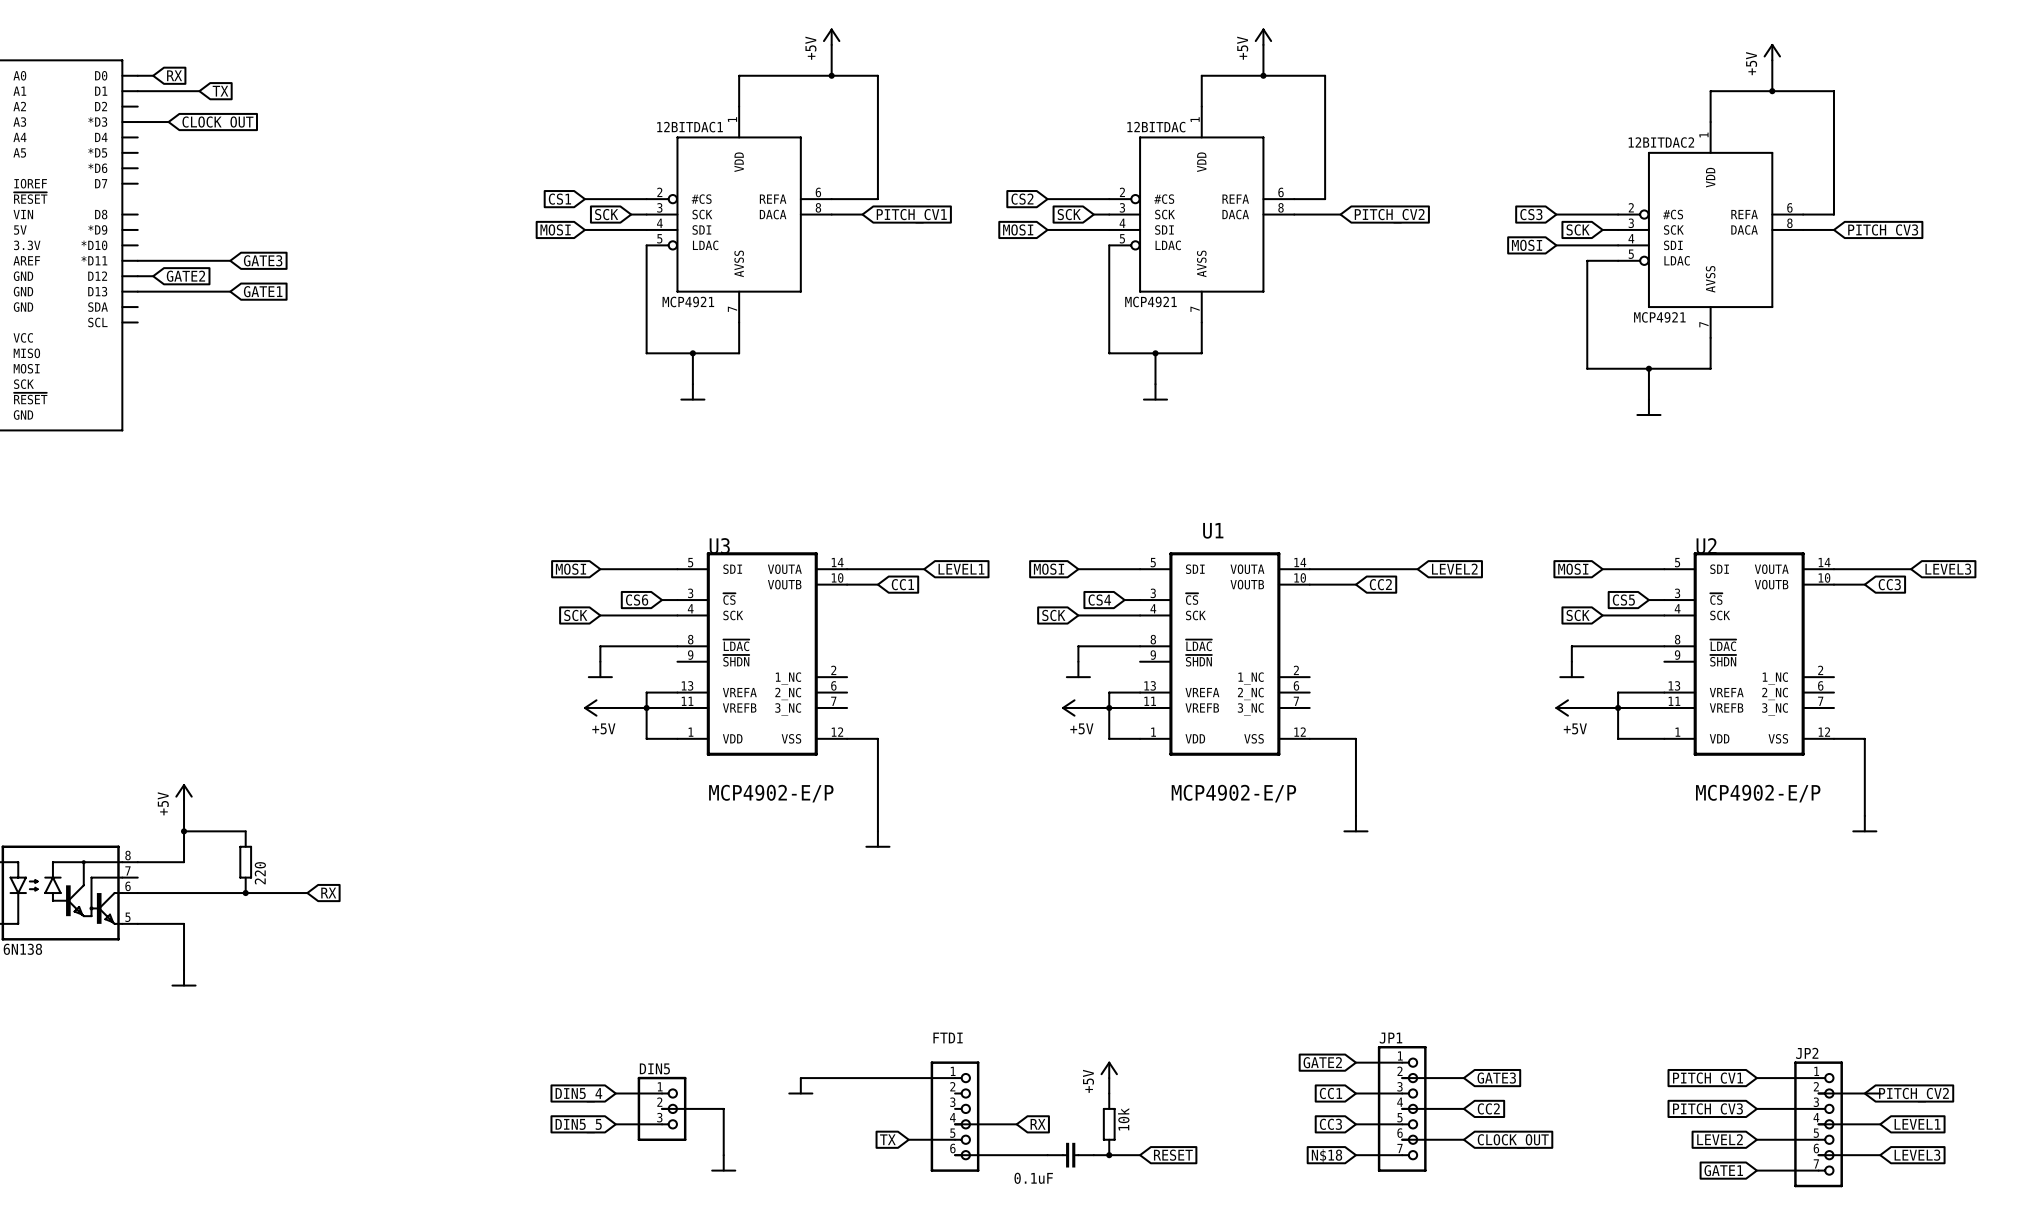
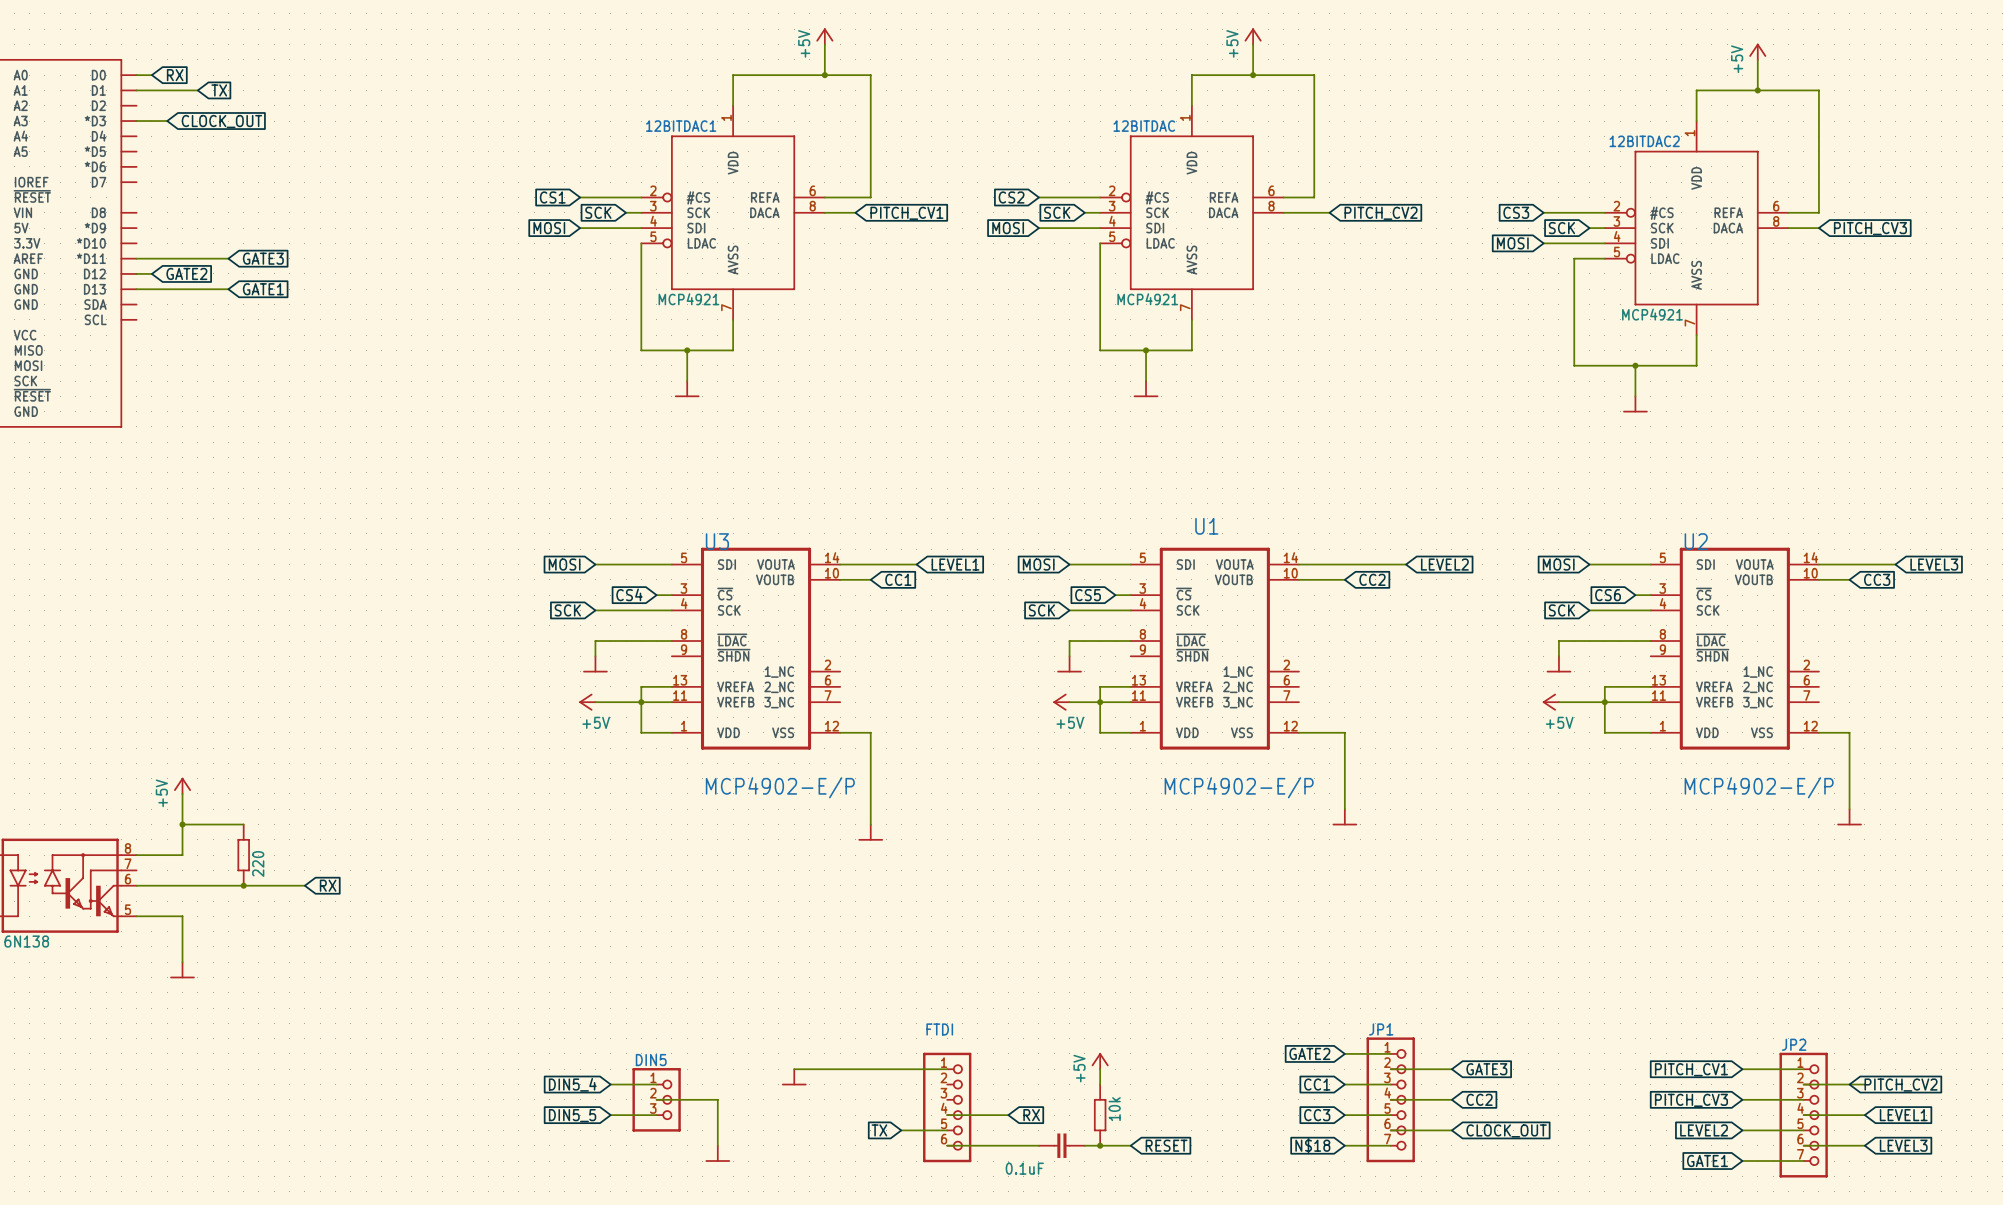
global label: CS6 (637, 600) -> CS4 (629, 594)
global label: CS4 (1099, 600) -> CS5 (1088, 595)
global label: CS5 (1623, 600) -> CS6 (1608, 595)

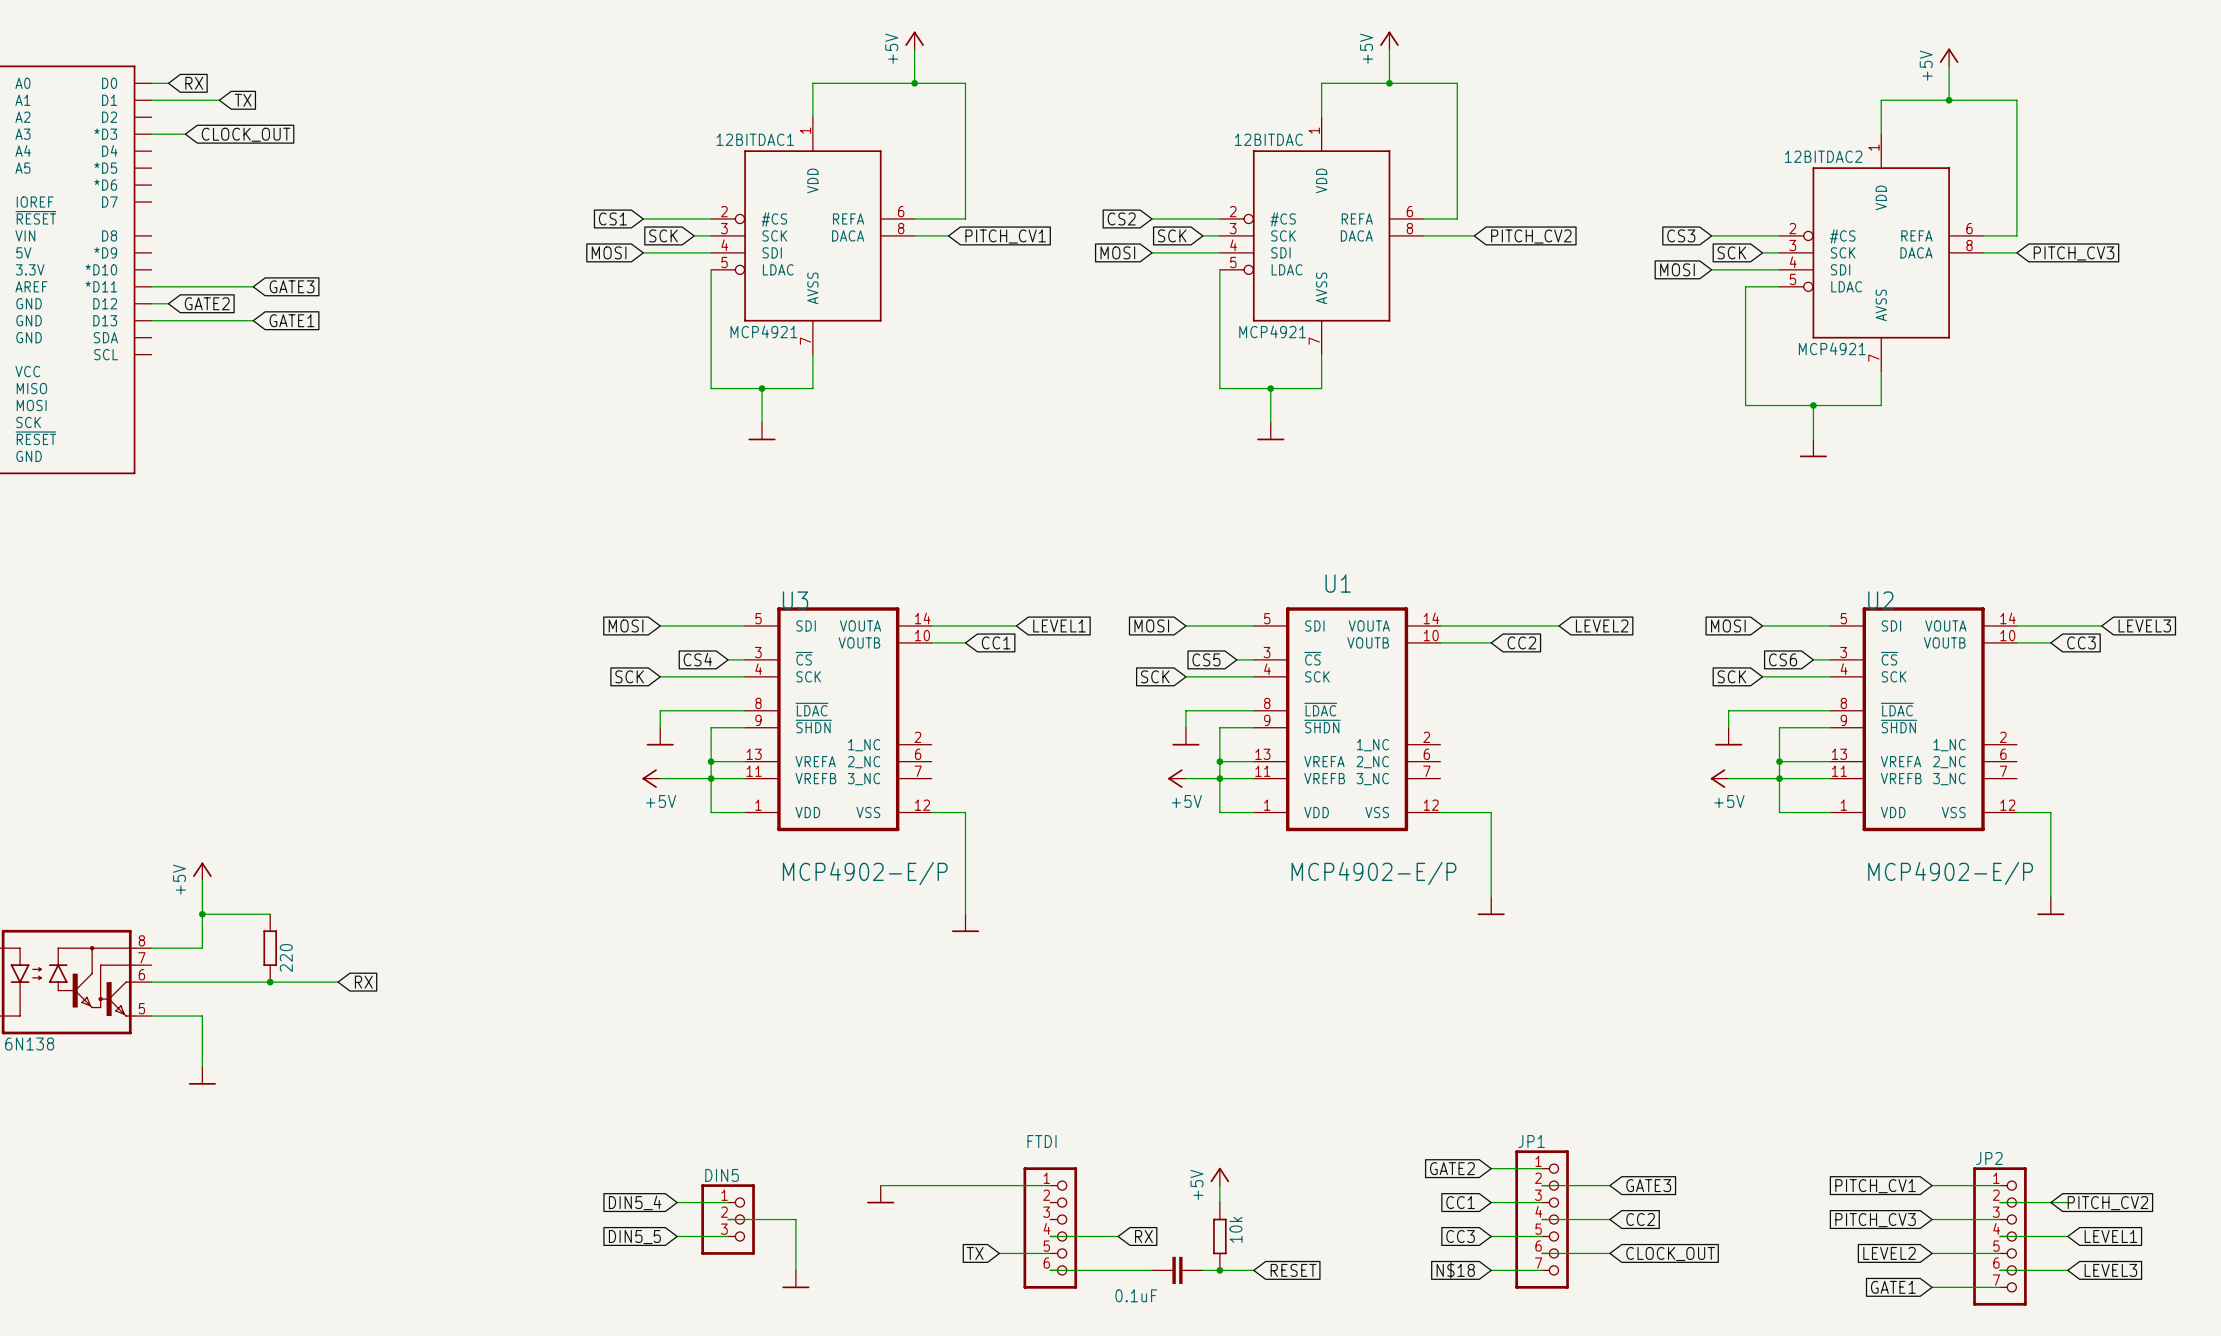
wire: none -> (745, 727) (711, 727) (711, 761)
wire: none -> (1253, 727) (1219, 727) (1219, 761)
wire: none -> (1830, 727) (1779, 727) (1779, 761)
junction: none -> (711, 761)
junction: none -> (1219, 761)
junction: none -> (1779, 761)

